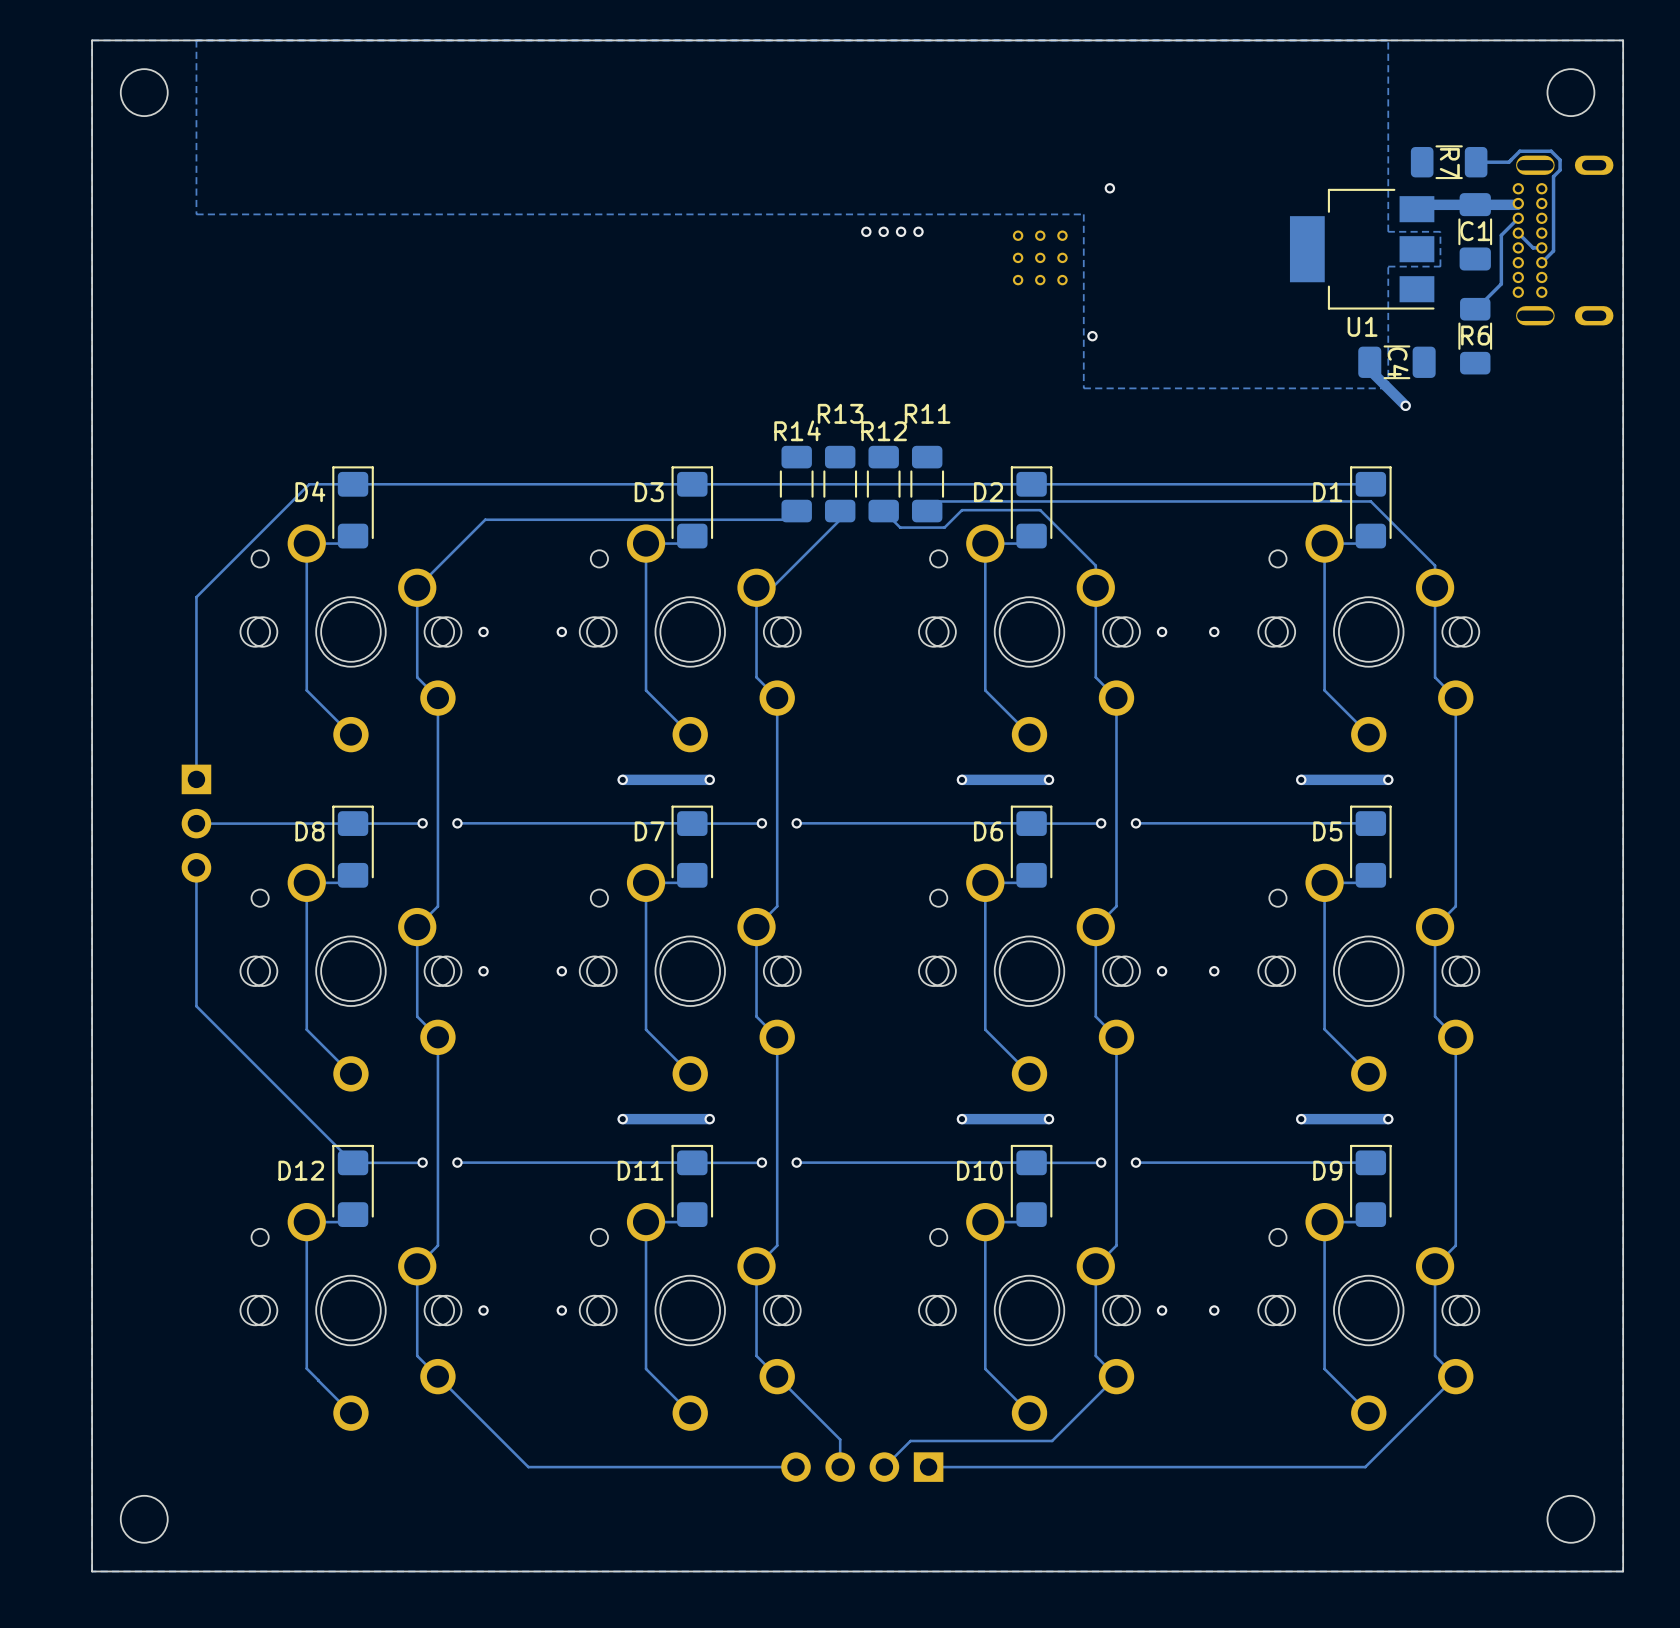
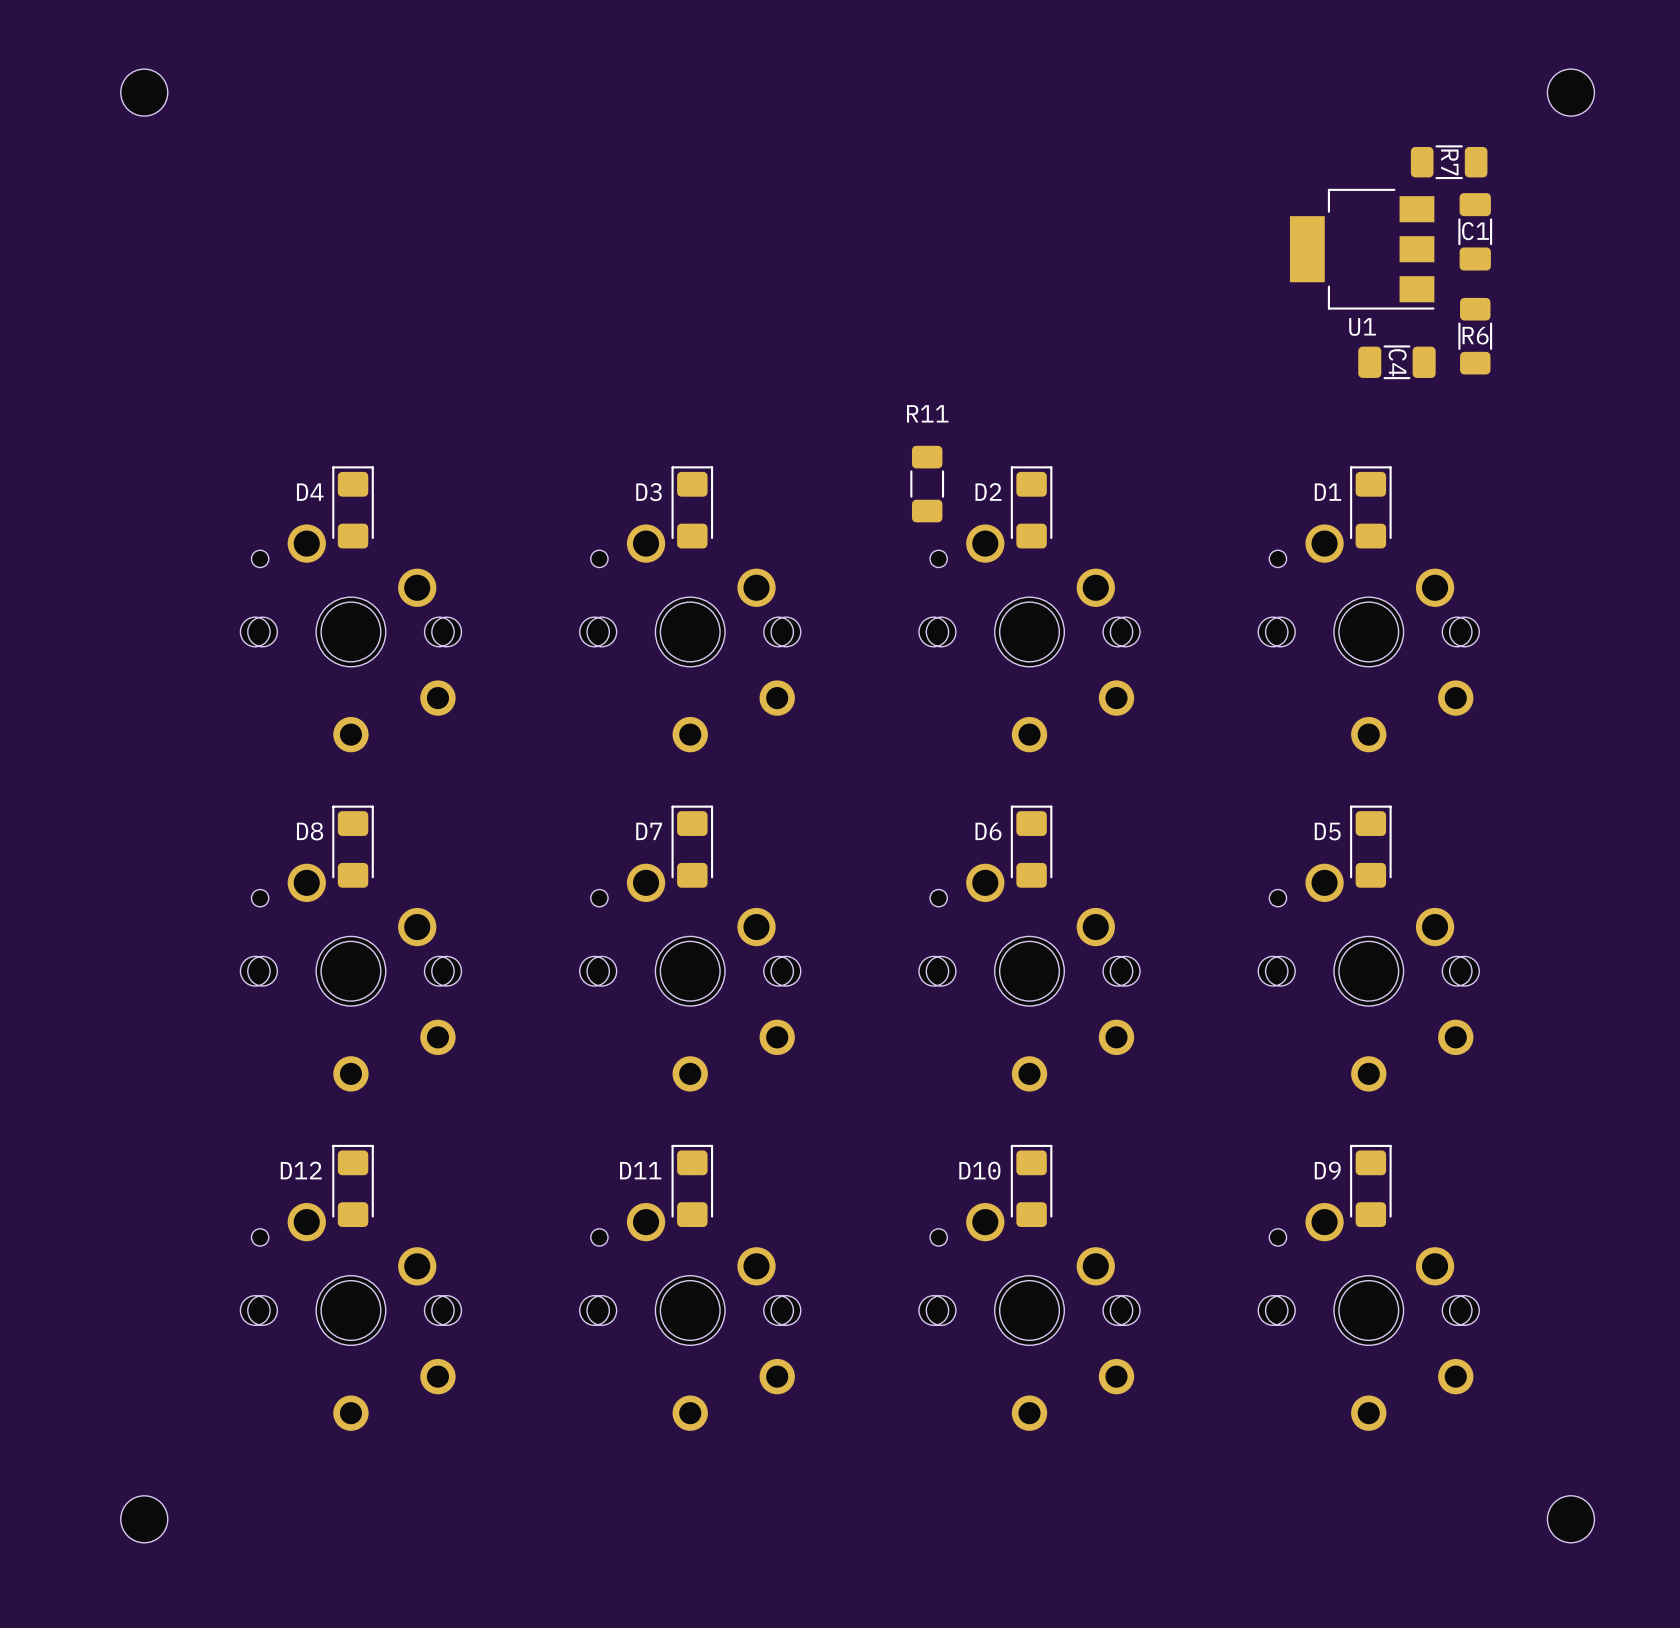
zone outline: (1388, 40) (1388, 231) (1440, 231) (1440, 266) (1388, 266) (1388, 388) (1083, 388) (1083, 214) (196, 214) (196, 40) -> none
board edge: (1623, 40) (92, 40) (92, 1571) (1623, 1571) (1623, 40) -> none
track: (1476, 162) (1508, 162) (1519, 151) (1551, 151) (1560, 160) (1560, 170) (1553, 176) (1553, 250) (1541, 262) -> none
via: (1109, 188) -> none
track: (1518, 203) (1421, 204) (1416, 209) -> none
track: (1518, 218) (1501, 235) (1501, 283) (1475, 309) -> none
via: (866, 231) -> none
via: (883, 231) -> none
via: (901, 231) -> none
via: (918, 231) -> none
track: (1518, 233) (1533, 247) (1541, 247) -> none
part: (1563, 240) -> none
part: (1040, 257) -> none
via: (1092, 336) -> none
track: (1369, 362) (1369, 369) (1405, 405) -> none
via: (1405, 405) -> none
R14: (796, 484) -> none
R13: (840, 484) -> none
R12: (883, 484) -> none
track: (1370, 484) (309, 484) (196, 597) (196, 779) -> none
track: (796, 511) (788, 519) (485, 519) (417, 587) (417, 677) (437, 698) (437, 906) (417, 927) (417, 1016) (437, 1037) (437, 1245) (417, 1266) (417, 1355) (528, 1467) (796, 1467) -> none
track: (840, 511) (840, 519) (772, 587) (756, 587) (756, 677) (777, 698) (777, 906) (756, 927) (756, 1016) (777, 1037) (777, 1245) (756, 1266) (756, 1355) (840, 1439) (840, 1467) -> none
track: (883, 511) (900, 527) (944, 527) (961, 510) (1040, 510) (1095, 565) (1095, 677) (1116, 698) (1116, 906) (1095, 927) (1095, 1016) (1116, 1037) (1116, 1245) (1095, 1266) (1095, 1355) (1116, 1376) (1052, 1441) (910, 1441) (884, 1467) -> none
track: (927, 511) (936, 501) (1370, 501) (1435, 565) (1435, 677) (1455, 698) (1455, 906) (1435, 927) (1435, 1016) (1455, 1037) (1455, 1245) (1435, 1266) (1435, 1355) (1455, 1376) (1365, 1467) (928, 1467) -> none
track: (353, 536) (345, 543) (306, 543) (306, 690) (350, 734) -> none
track: (692, 536) (684, 543) (646, 543) (646, 690) (690, 734) -> none
track: (1031, 536) (1024, 543) (985, 543) (985, 690) (1029, 734) -> none
track: (1370, 536) (1363, 543) (1324, 543) (1324, 690) (1368, 734) -> none
via: (483, 631) -> none
via: (561, 631) -> none
via: (1162, 631) -> none
via: (1214, 631) -> none
via: (622, 779) -> none
track: (709, 779) (622, 779) -> none
via: (709, 779) -> none
via: (961, 779) -> none
track: (1048, 779) (961, 779) -> none
via: (1048, 779) -> none
via: (1301, 779) -> none
track: (1388, 779) (1301, 779) -> none
via: (1388, 779) -> none
part: (196, 823) -> none
track: (352, 823) (196, 823) -> none
track: (422, 823) (353, 823) -> none
via: (422, 823) -> none
via: (457, 823) -> none
track: (692, 823) (457, 823) -> none
track: (761, 823) (692, 823) -> none
via: (761, 823) -> none
via: (796, 823) -> none
track: (1031, 823) (796, 823) -> none
track: (1100, 823) (1031, 823) -> none
via: (1101, 823) -> none
via: (1135, 823) -> none
track: (1370, 823) (1135, 823) -> none
track: (196, 867) (196, 1006) (353, 1162) (422, 1162) -> none
track: (353, 875) (345, 882) (306, 882) (306, 1029) (350, 1073) -> none
track: (692, 875) (684, 882) (646, 882) (646, 1029) (690, 1073) -> none
track: (1031, 875) (1024, 882) (985, 882) (985, 1029) (1029, 1073) -> none
track: (1370, 875) (1363, 882) (1324, 882) (1324, 1029) (1368, 1073) -> none
via: (483, 971) -> none
via: (561, 971) -> none
via: (1162, 971) -> none
via: (1214, 971) -> none
via: (622, 1119) -> none
track: (709, 1119) (622, 1119) -> none
via: (709, 1119) -> none
via: (961, 1119) -> none
track: (1048, 1119) (961, 1119) -> none
via: (1048, 1119) -> none
via: (1301, 1119) -> none
track: (1388, 1119) (1301, 1119) -> none
via: (1388, 1119) -> none
via: (422, 1162) -> none
via: (457, 1162) -> none
track: (692, 1162) (457, 1162) -> none
track: (761, 1162) (692, 1162) -> none
via: (761, 1162) -> none
via: (796, 1162) -> none
track: (1031, 1162) (796, 1162) -> none
track: (1100, 1162) (1031, 1162) -> none
via: (1101, 1162) -> none
via: (1135, 1162) -> none
track: (1370, 1162) (1135, 1162) -> none
track: (353, 1214) (345, 1222) (306, 1222) (306, 1368) (318, 1380) -> none
track: (692, 1214) (684, 1222) (646, 1222) (646, 1368) (690, 1413) -> none
track: (1031, 1214) (1024, 1222) (985, 1222) (985, 1368) (1029, 1413) -> none
track: (1370, 1214) (1363, 1222) (1324, 1222) (1324, 1368) (1368, 1413) -> none
via: (483, 1310) -> none
via: (561, 1310) -> none
via: (1162, 1310) -> none
via: (1214, 1310) -> none
track: (318, 1380) (350, 1413) -> none
part: (862, 1467) -> none

